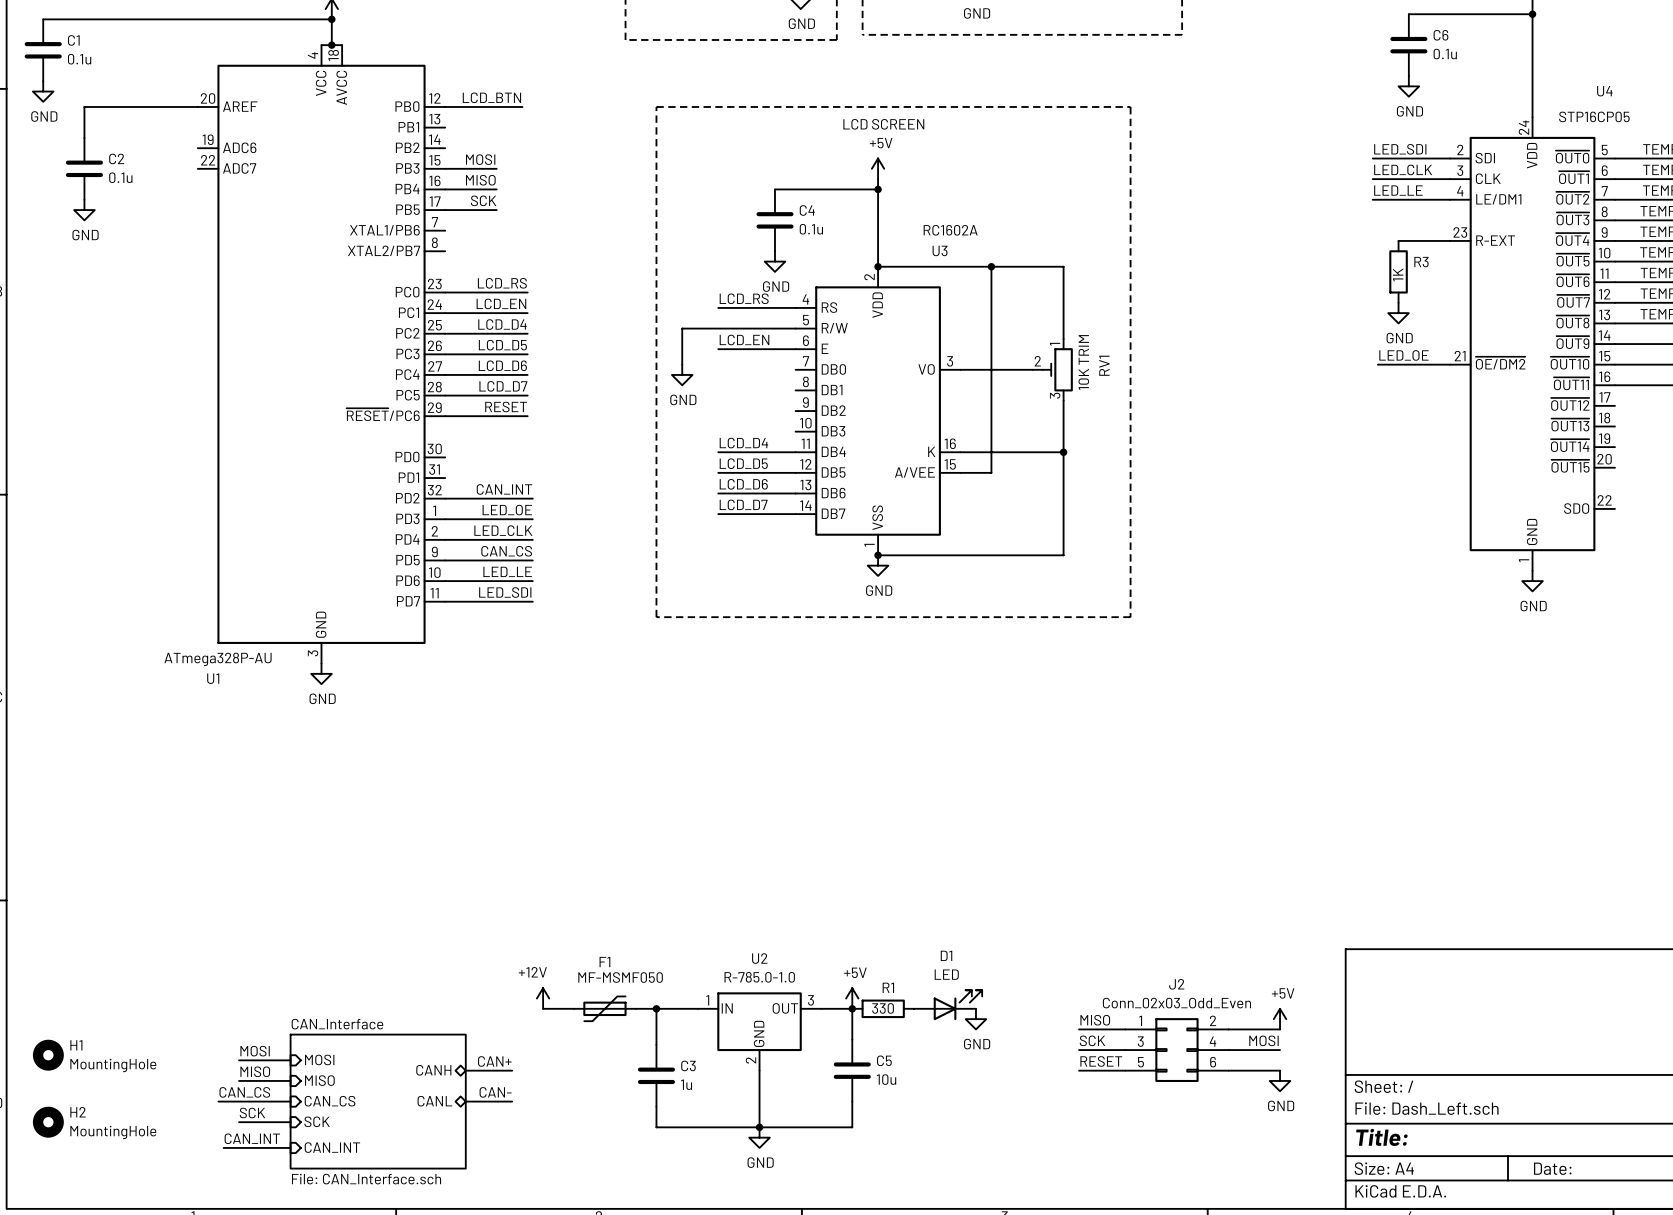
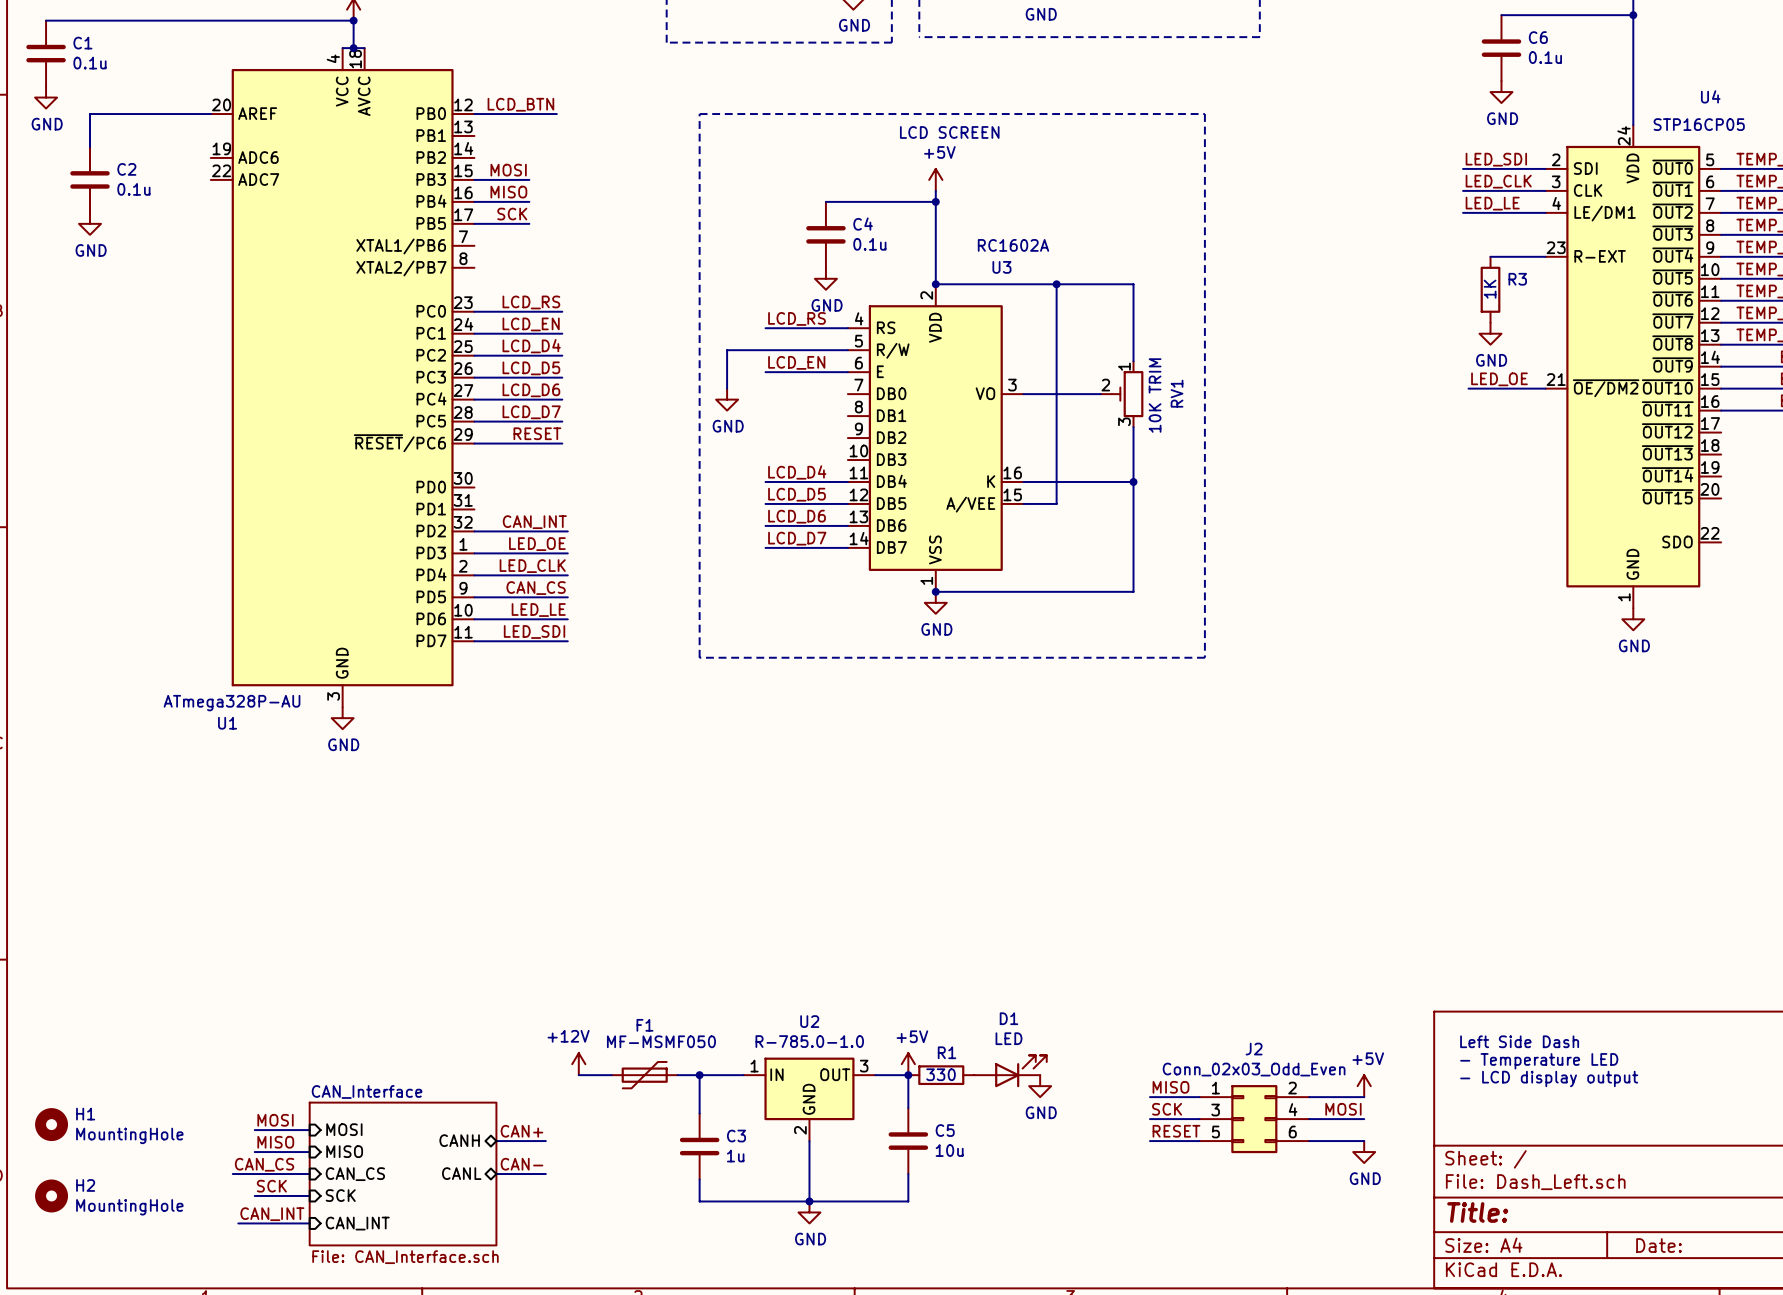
text: none -> Left Side Dash (1519, 1041)
text: none -> - Temperature LED (1539, 1061)
text: none -> - LCD display output (1549, 1078)

